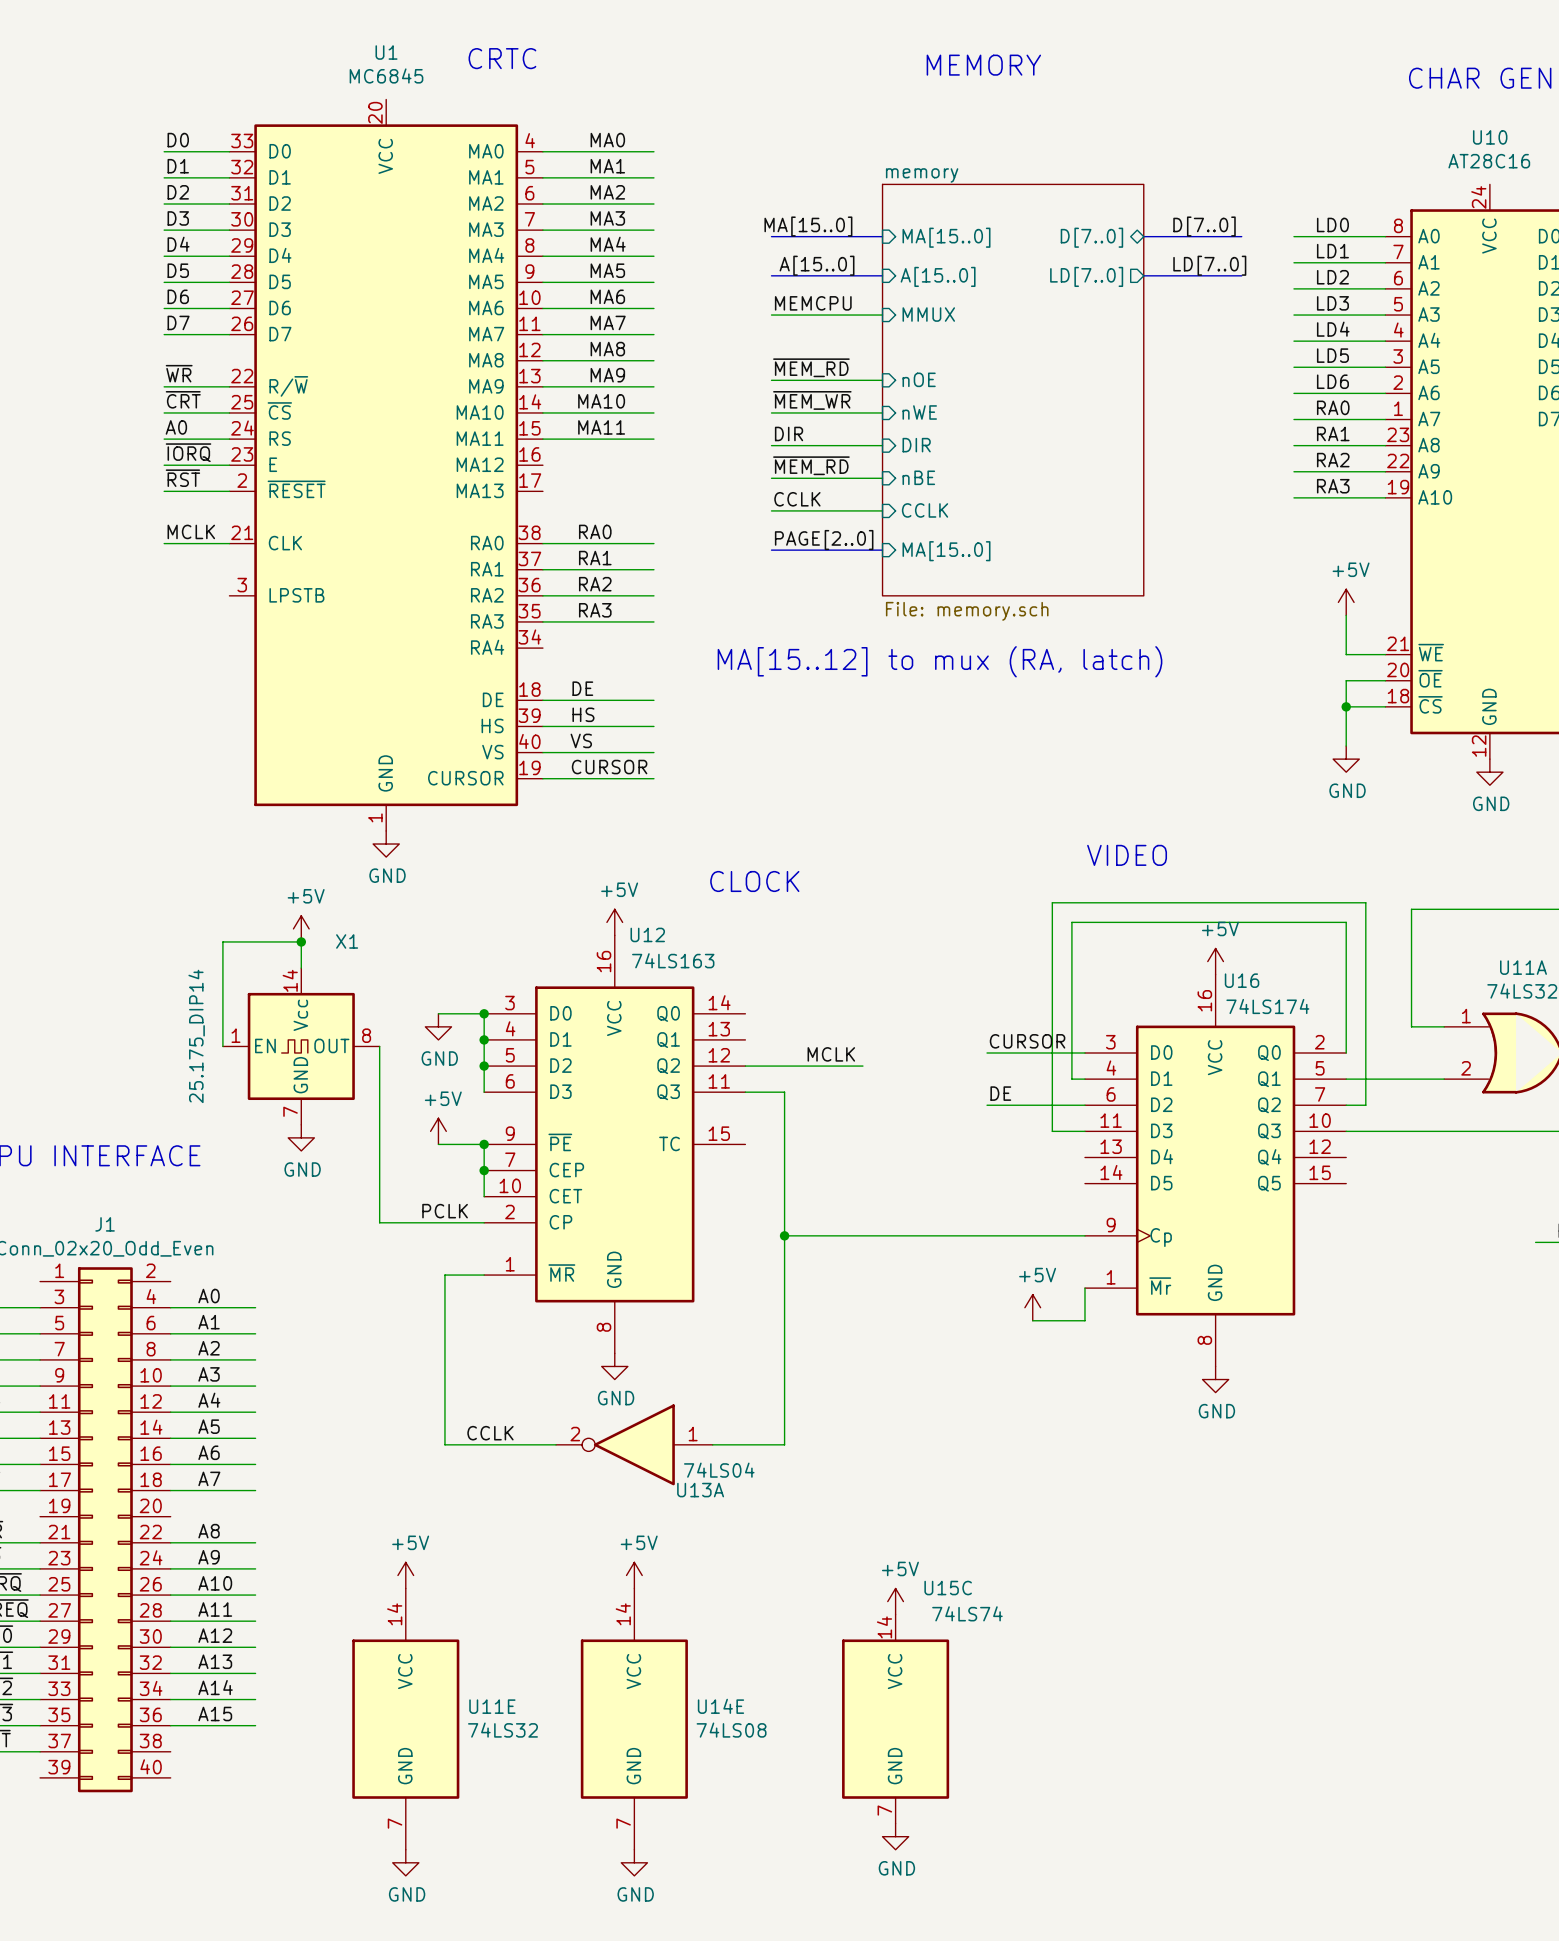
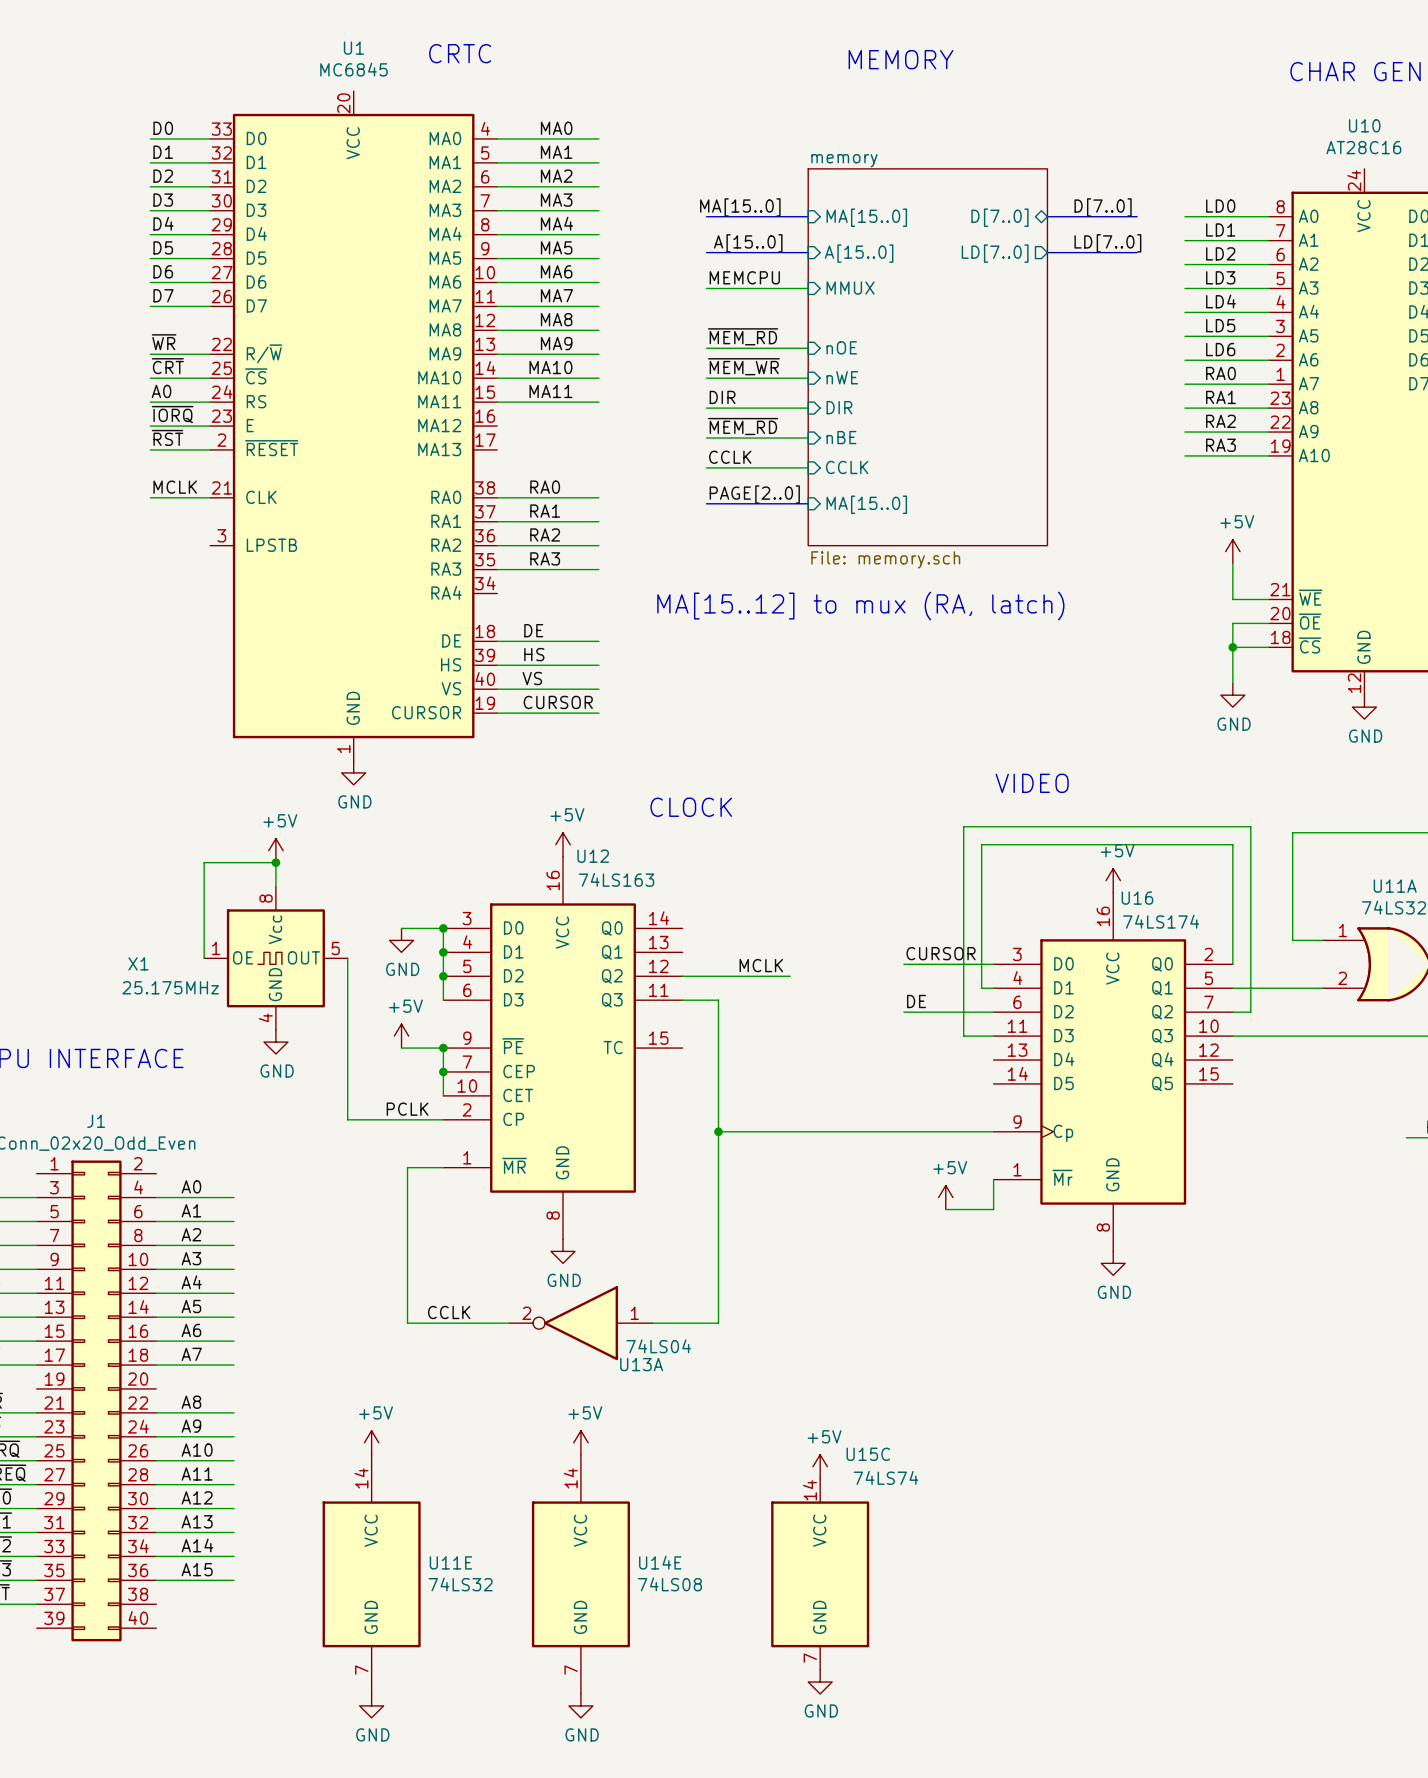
X1 name position: X1 (347, 941) -> X1 (138, 963)
X1 pin number: 14 (290, 980) -> 8 (266, 898)
X1 pin number: 8 (366, 1035) -> 5 (335, 948)
X1 value: 25.175_DIP14 (196, 1036) -> 25.175MHz (170, 987)
X1 pin name: EN (265, 1045) -> OE (243, 957)
X1 pin number: 7 (290, 1111) -> 4 (265, 1017)

